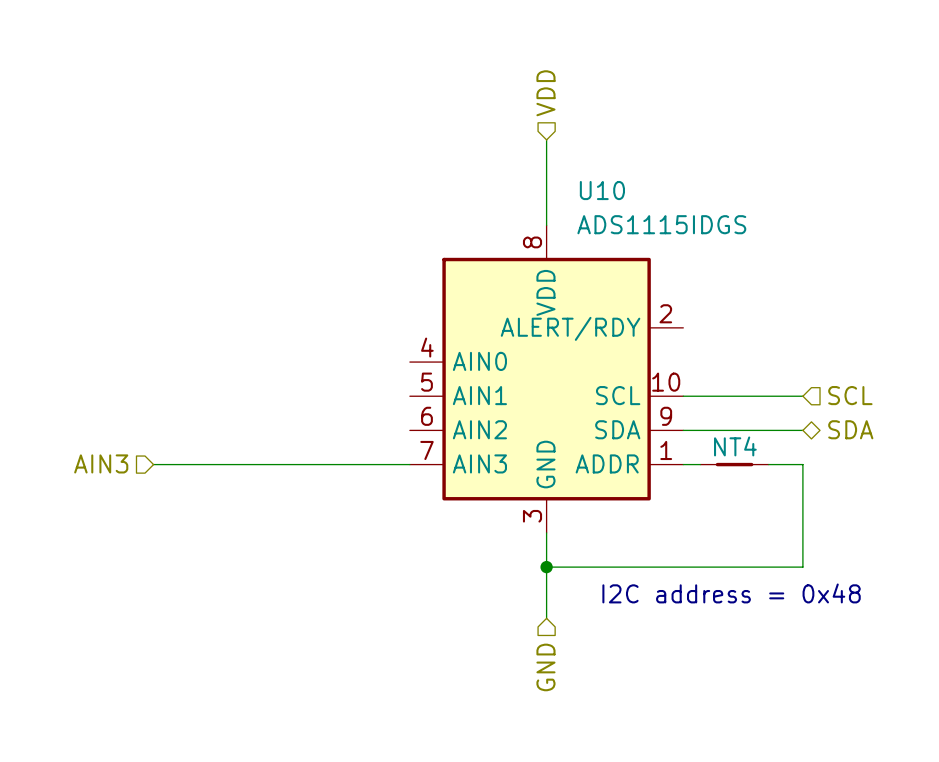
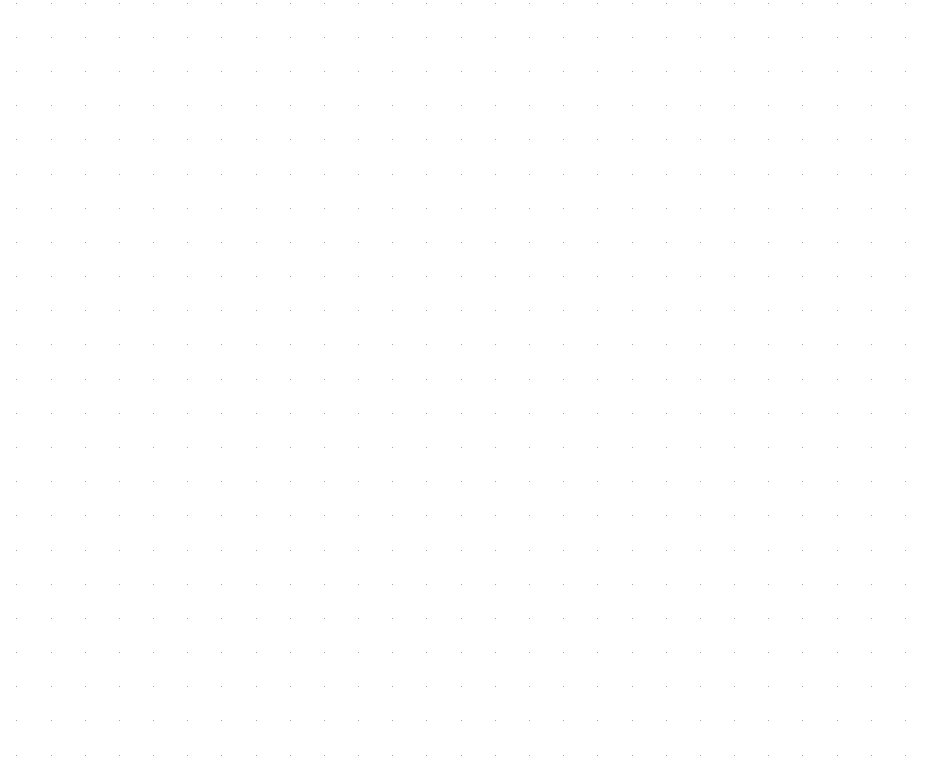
hierarchical label: VDD (545, 93) -> none
wire: (546, 139) (546, 225) -> none
U10: ADS1115IDGS (546, 379) -> none
hierarchical label: SCL (850, 395) -> none
wire: (683, 396) (802, 396) -> none
hierarchical label: SDA (850, 429) -> none
wire: (683, 430) (802, 430) -> none
hierarchical label: AIN3 (101, 463) -> none
wire: (153, 464) (409, 464) -> none
wire: (683, 464) (700, 464) -> none
NT4: (734, 464) -> none
wire: (768, 464) (802, 464) (802, 567) (546, 567) -> none
wire: (546, 532) (546, 618) -> none
junction: (546, 567) -> none
text: I2C address = 0x48 (731, 593) -> none
hierarchical label: GND (545, 667) -> none

